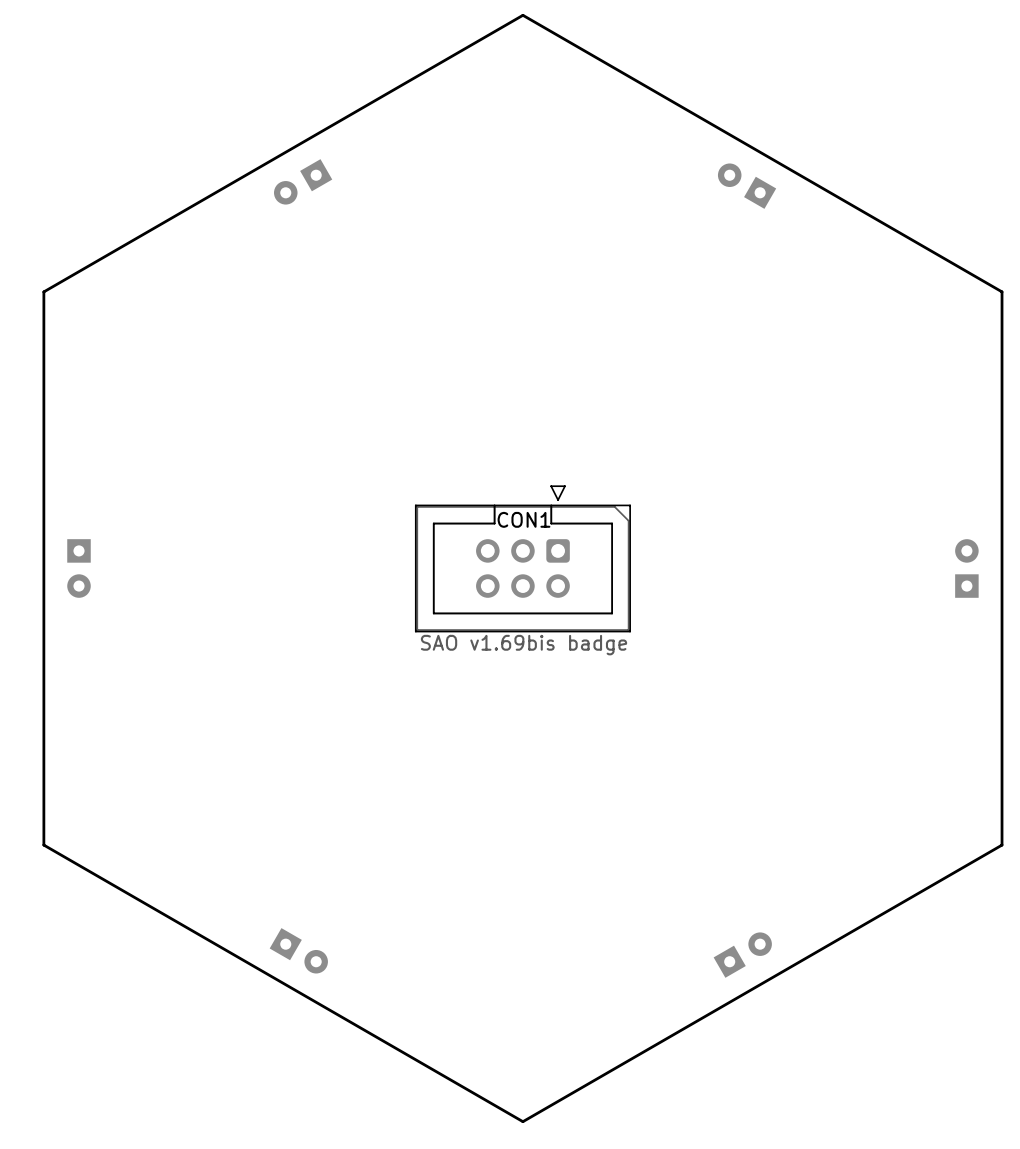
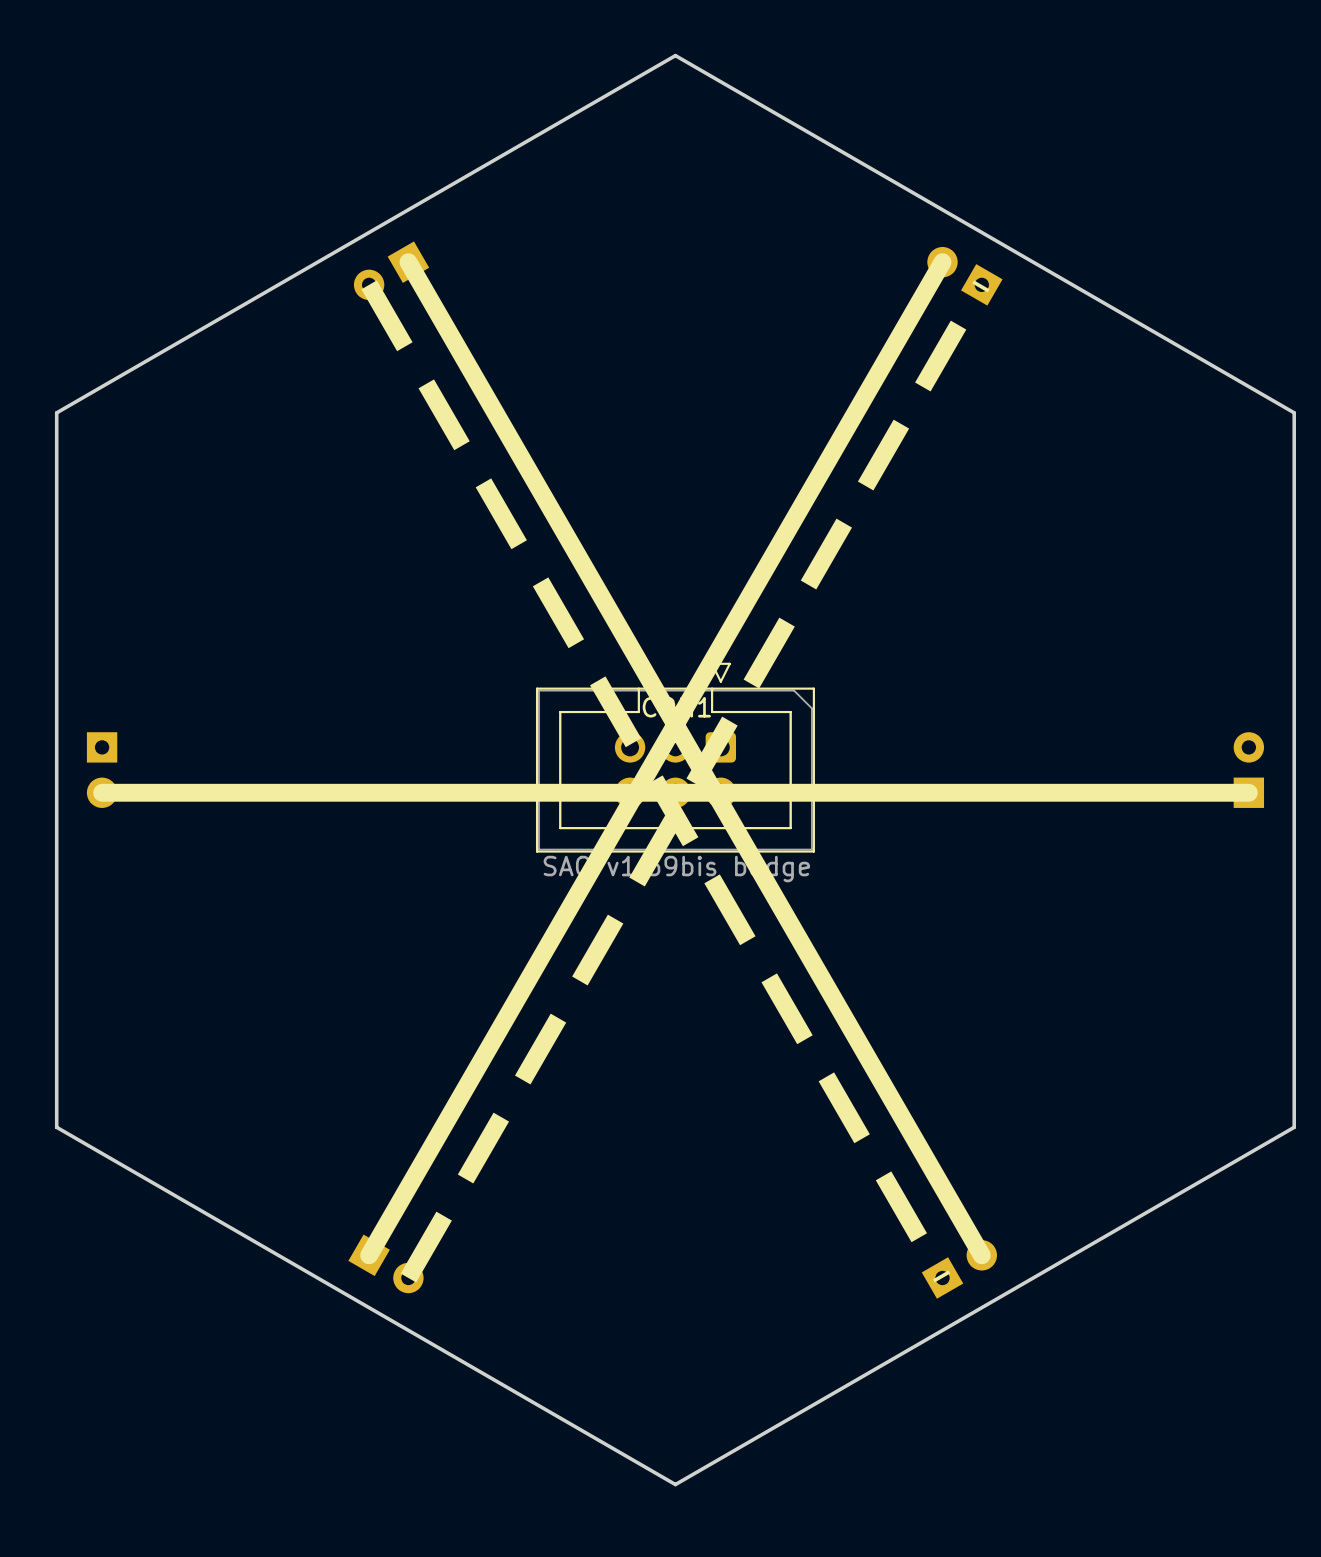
line: none -> (408, 262) (981, 1255)
line: none -> (942, 262) (369, 1255)
line: none -> (369, 284) (942, 1277)
line: none -> (981, 284) (408, 1277)
line: none -> (102, 792) (1248, 792)

